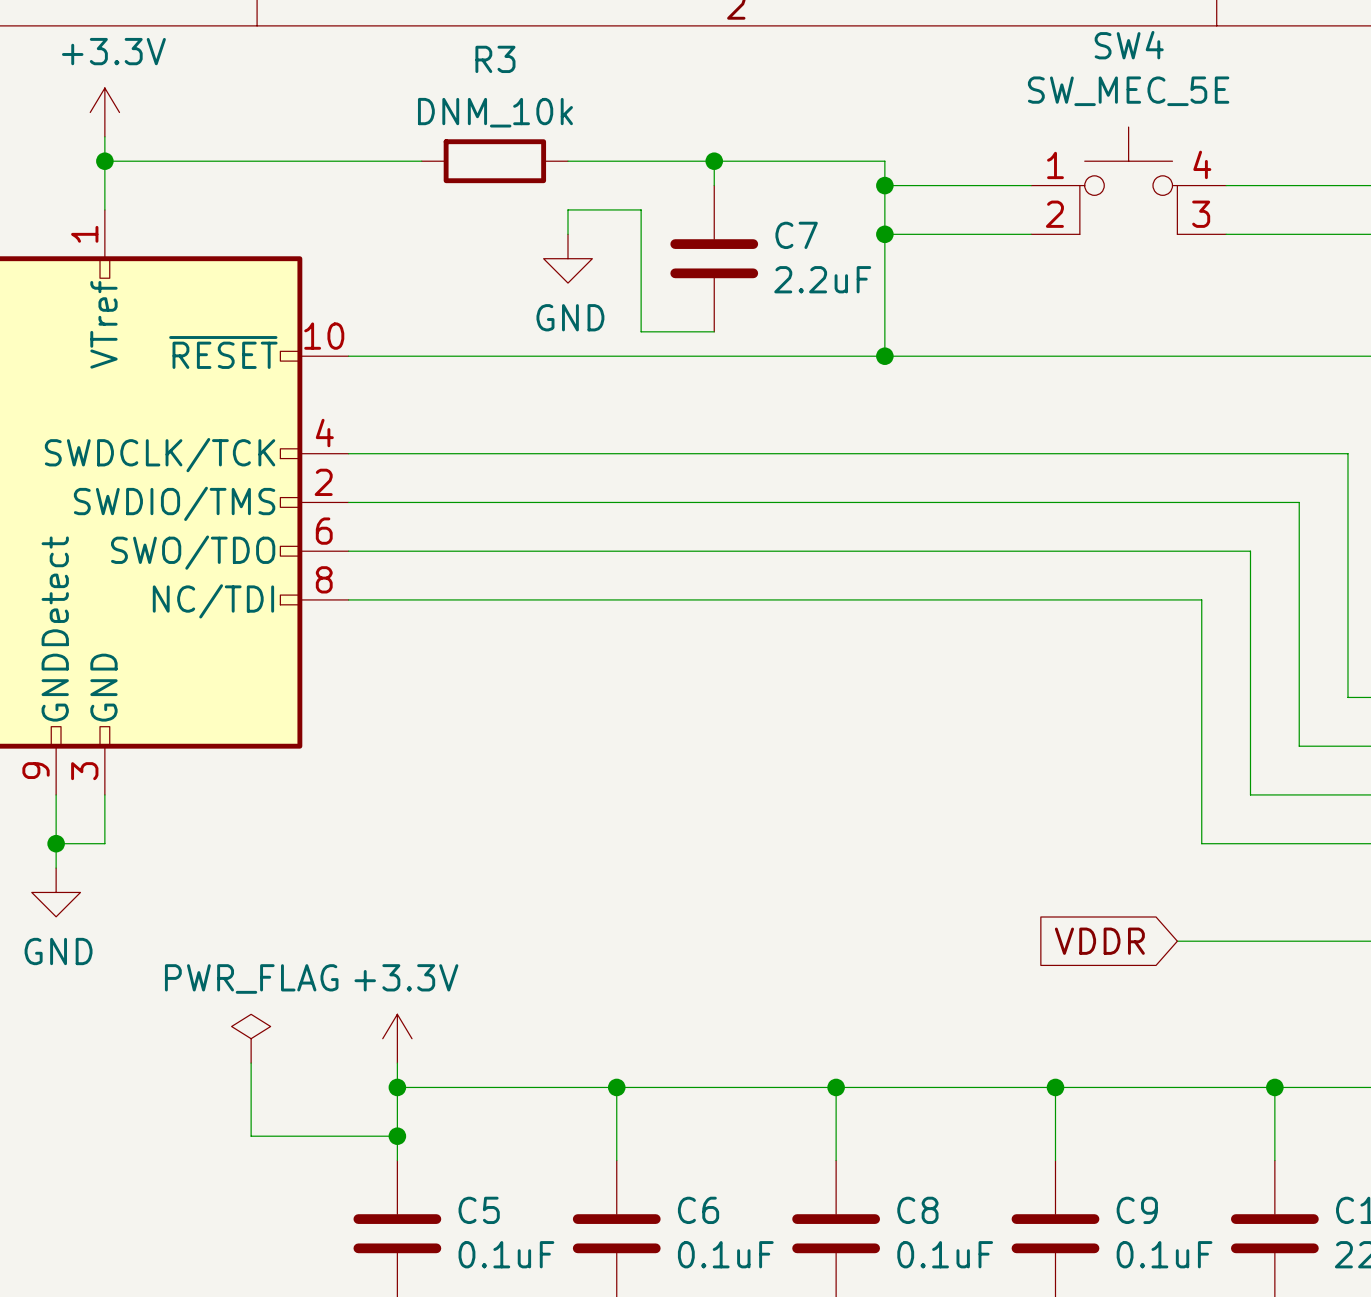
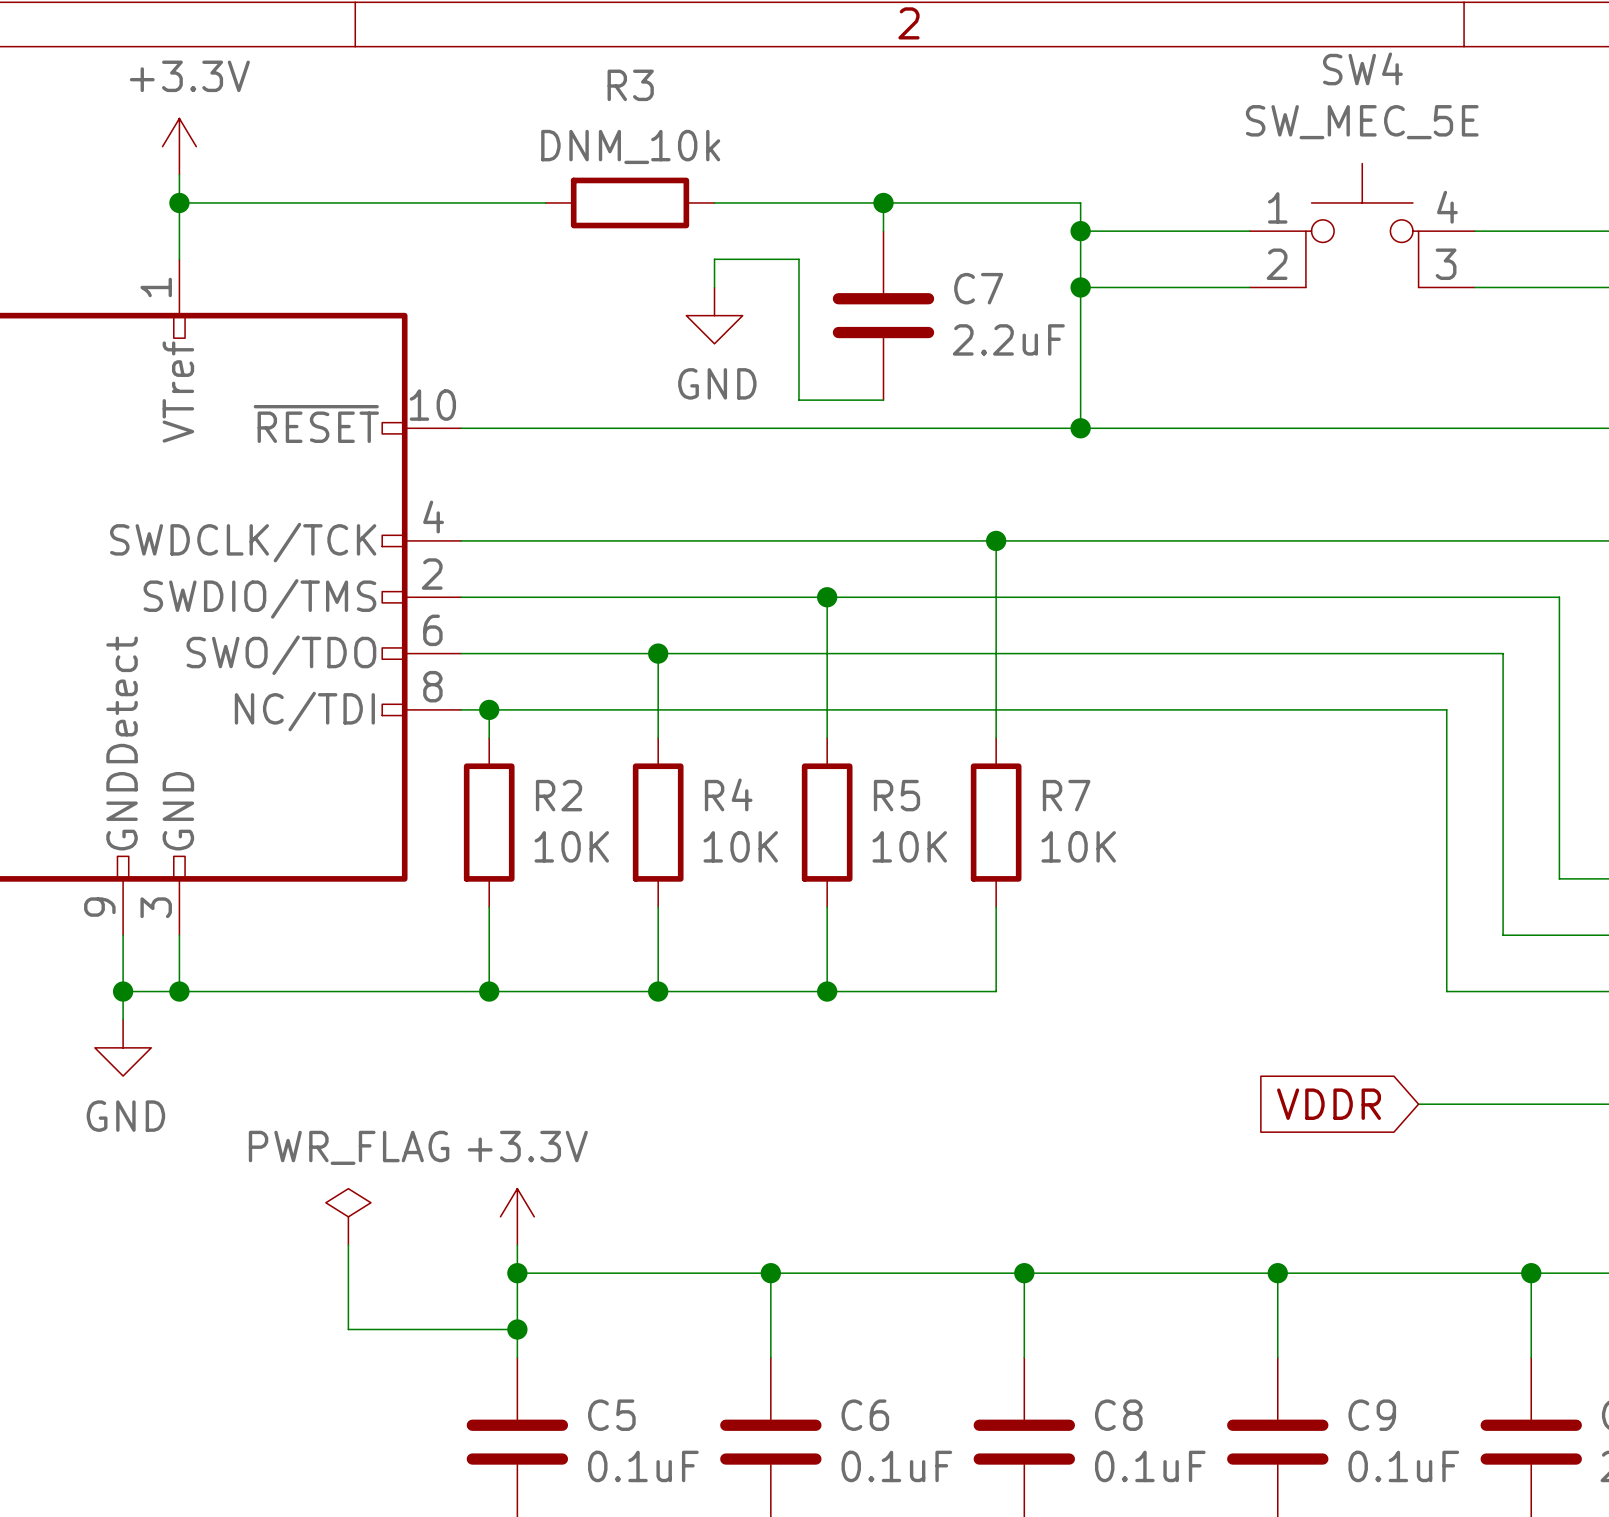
wire: none -> (996, 540) (996, 738)
junction: none -> (996, 540)
wire: none -> (827, 597) (827, 738)
junction: none -> (827, 597)
wire: none -> (658, 653) (658, 738)
junction: none -> (658, 653)
wire: none -> (489, 709) (489, 738)
junction: none -> (489, 709)
R2: none -> 10K (489, 822)
R4: none -> 10K (658, 822)
R5: none -> 10K (827, 822)
R7: none -> 10K (996, 822)
wire: none -> (489, 907) (489, 991)
wire: none -> (658, 907) (658, 991)
wire: none -> (827, 907) (827, 991)
wire: none -> (996, 907) (996, 991) (179, 991)
junction: none -> (179, 991)
junction: none -> (489, 991)
junction: none -> (658, 991)
junction: none -> (827, 991)

